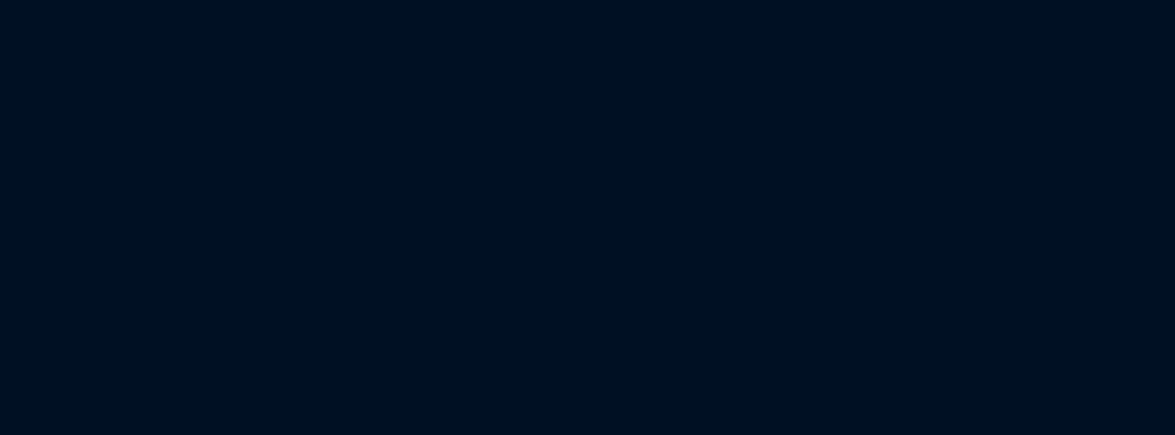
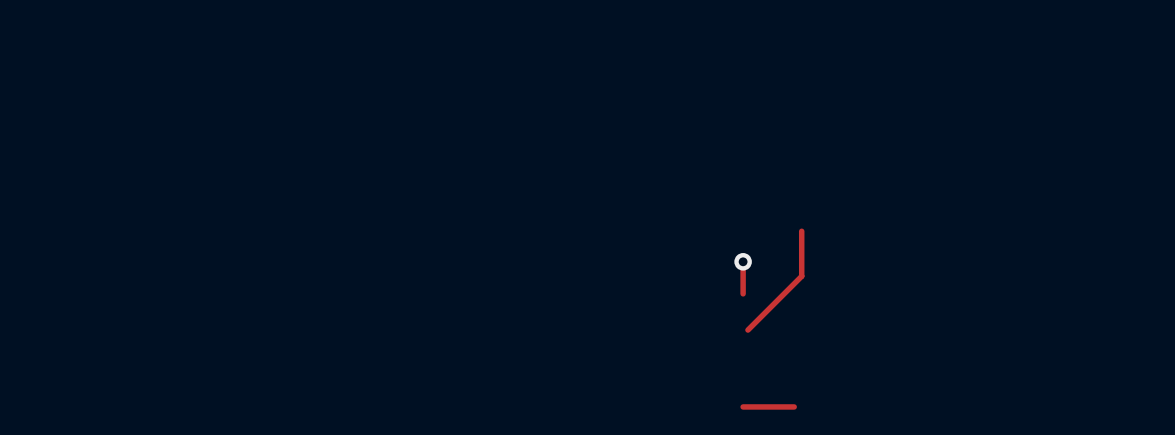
top track: none -> (801, 231) (801, 276) (747, 330)
top track: none -> (743, 261) (743, 293)
via: none -> (743, 261)
top track: none -> (743, 406) (794, 406)

